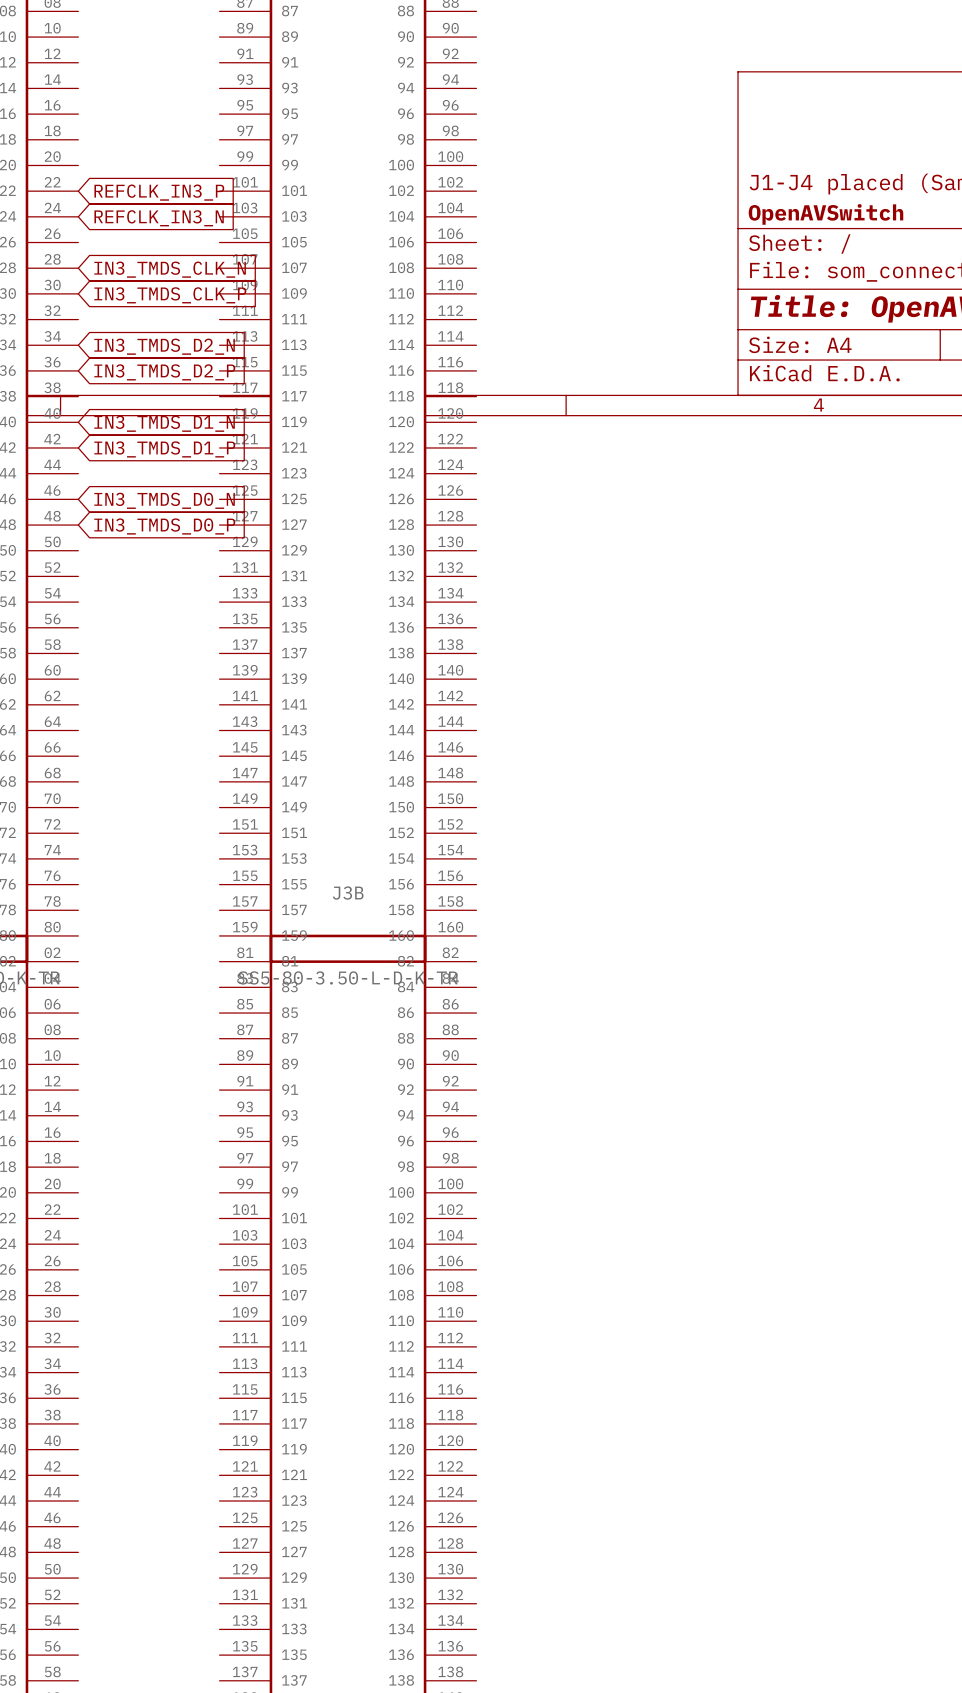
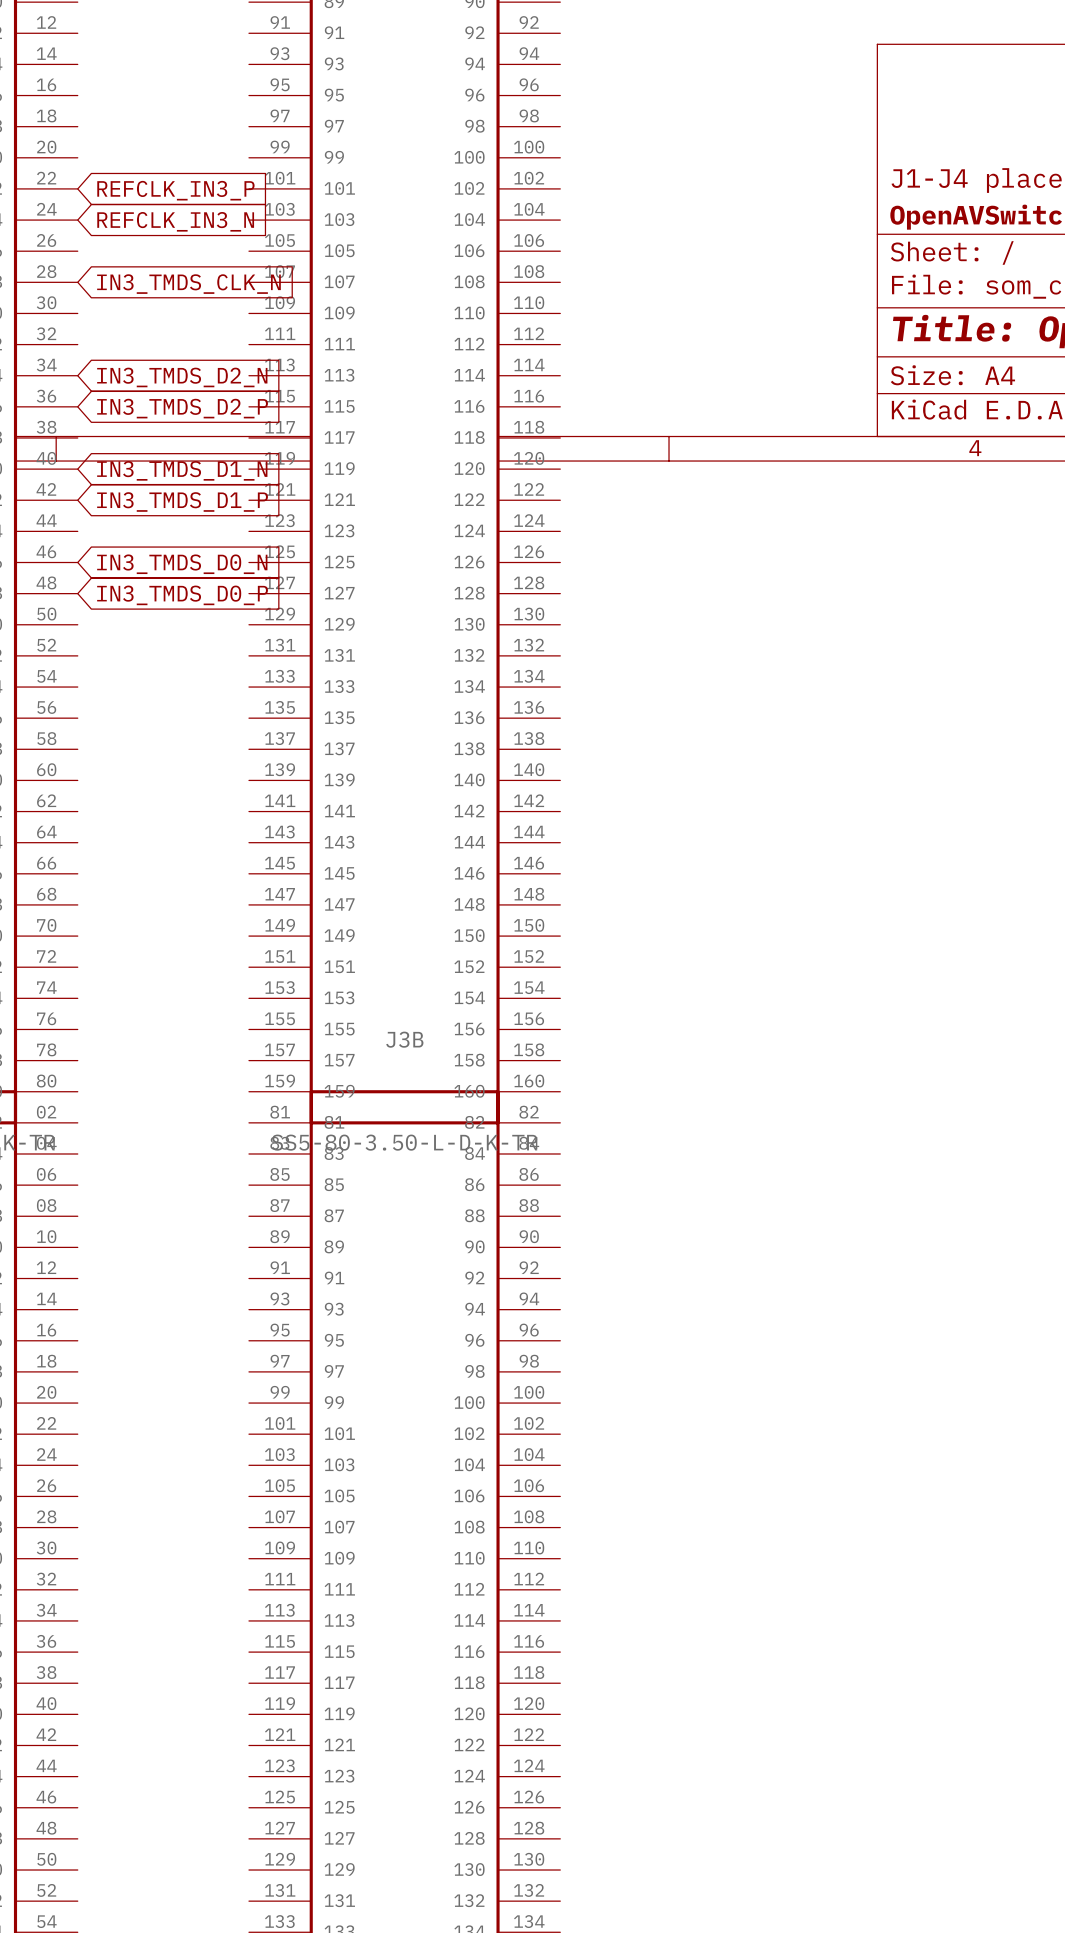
global label: IN3_TMDS_CLK_P (170, 295) -> none

